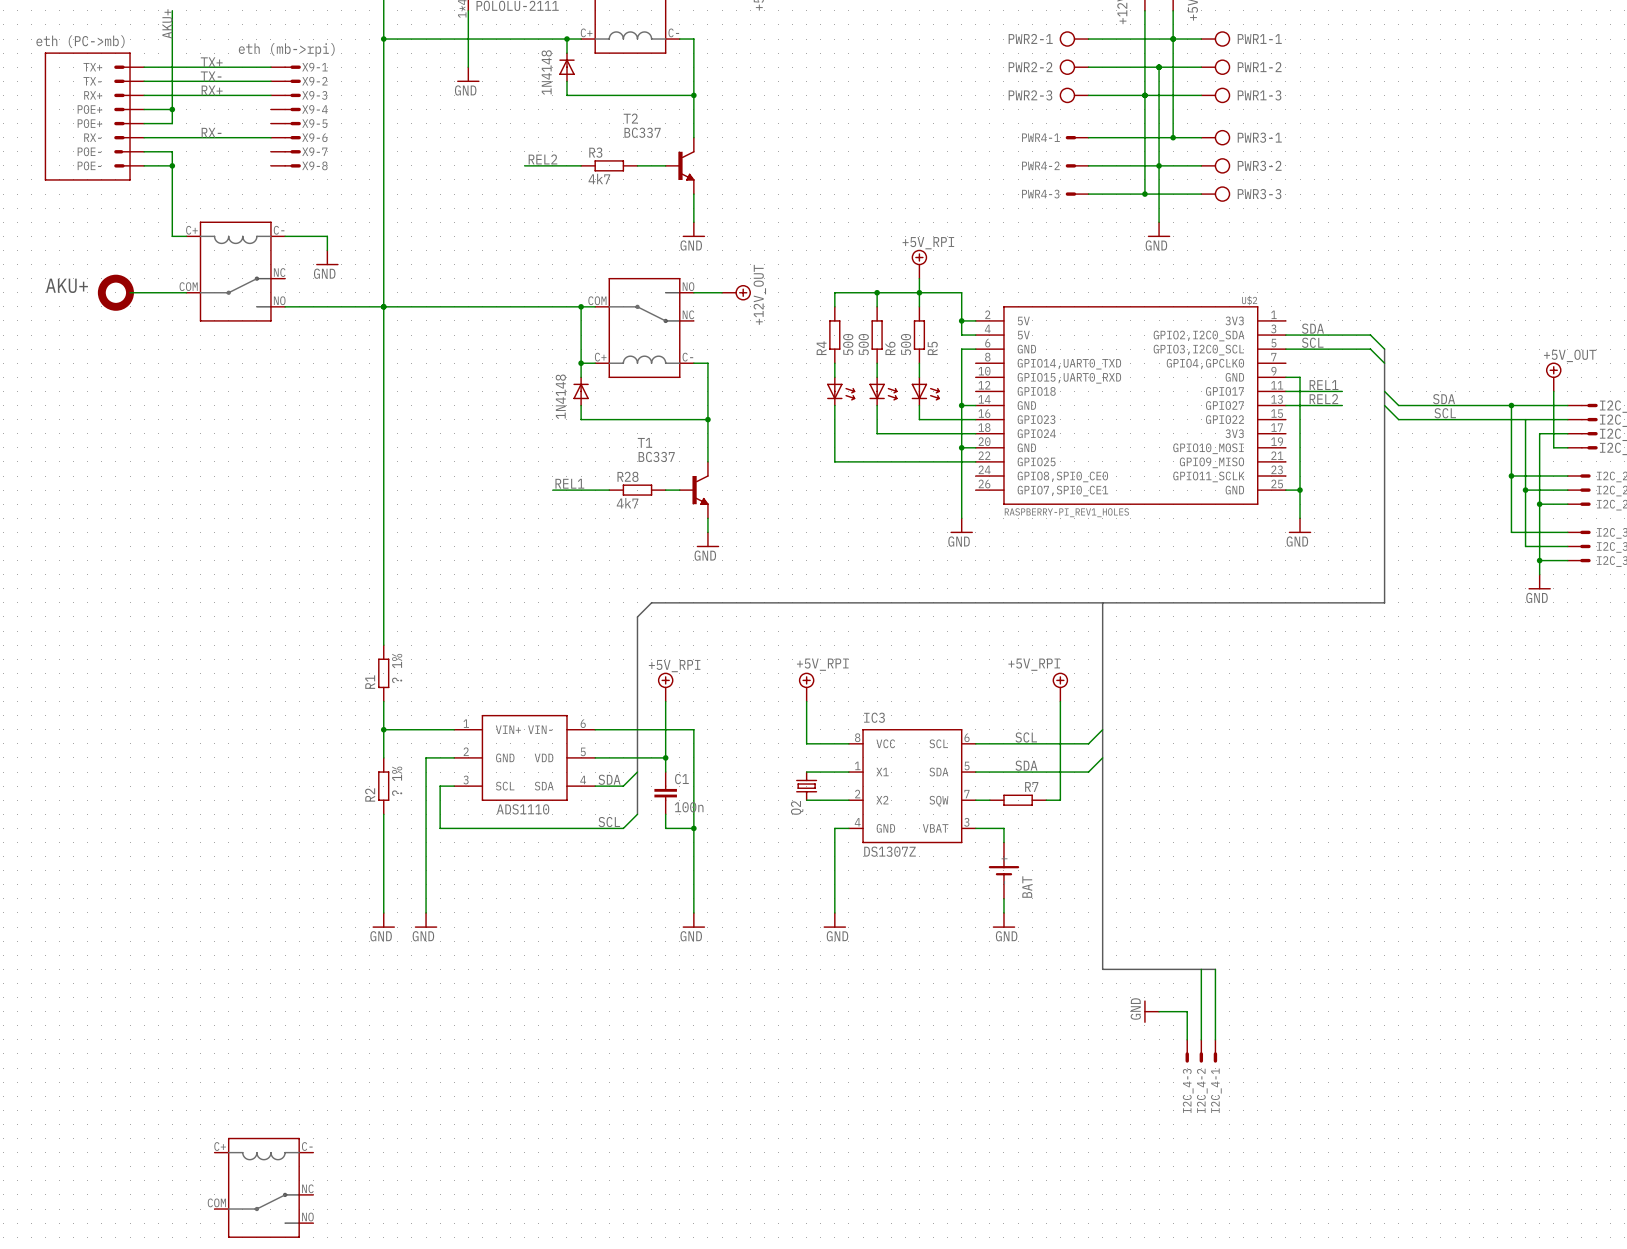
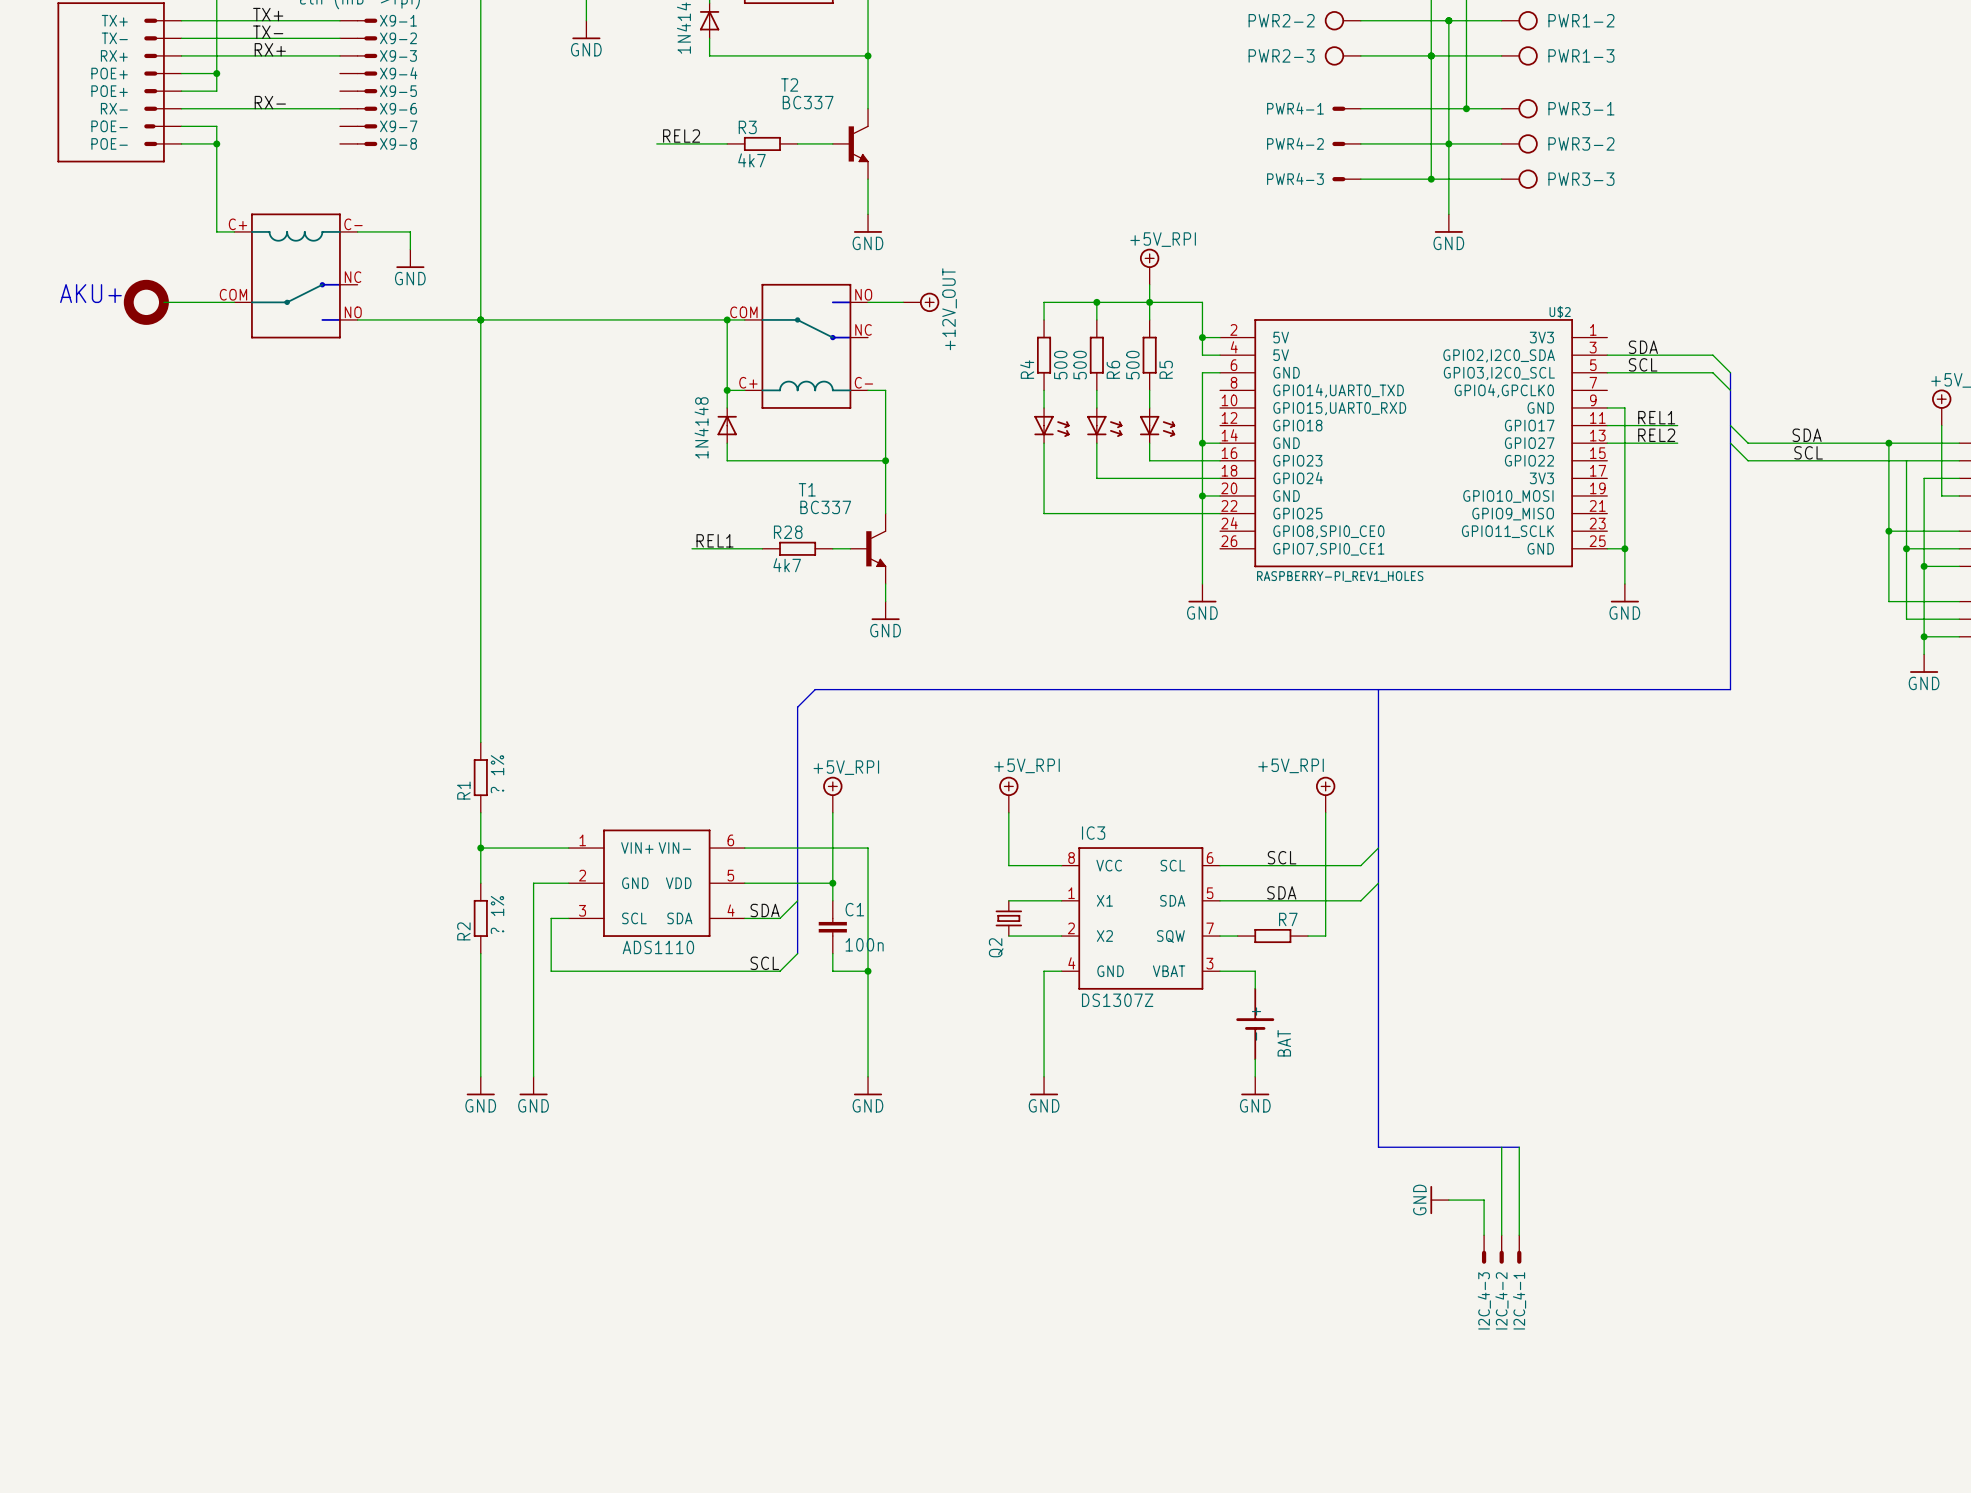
part: (263, 1187) -> none

